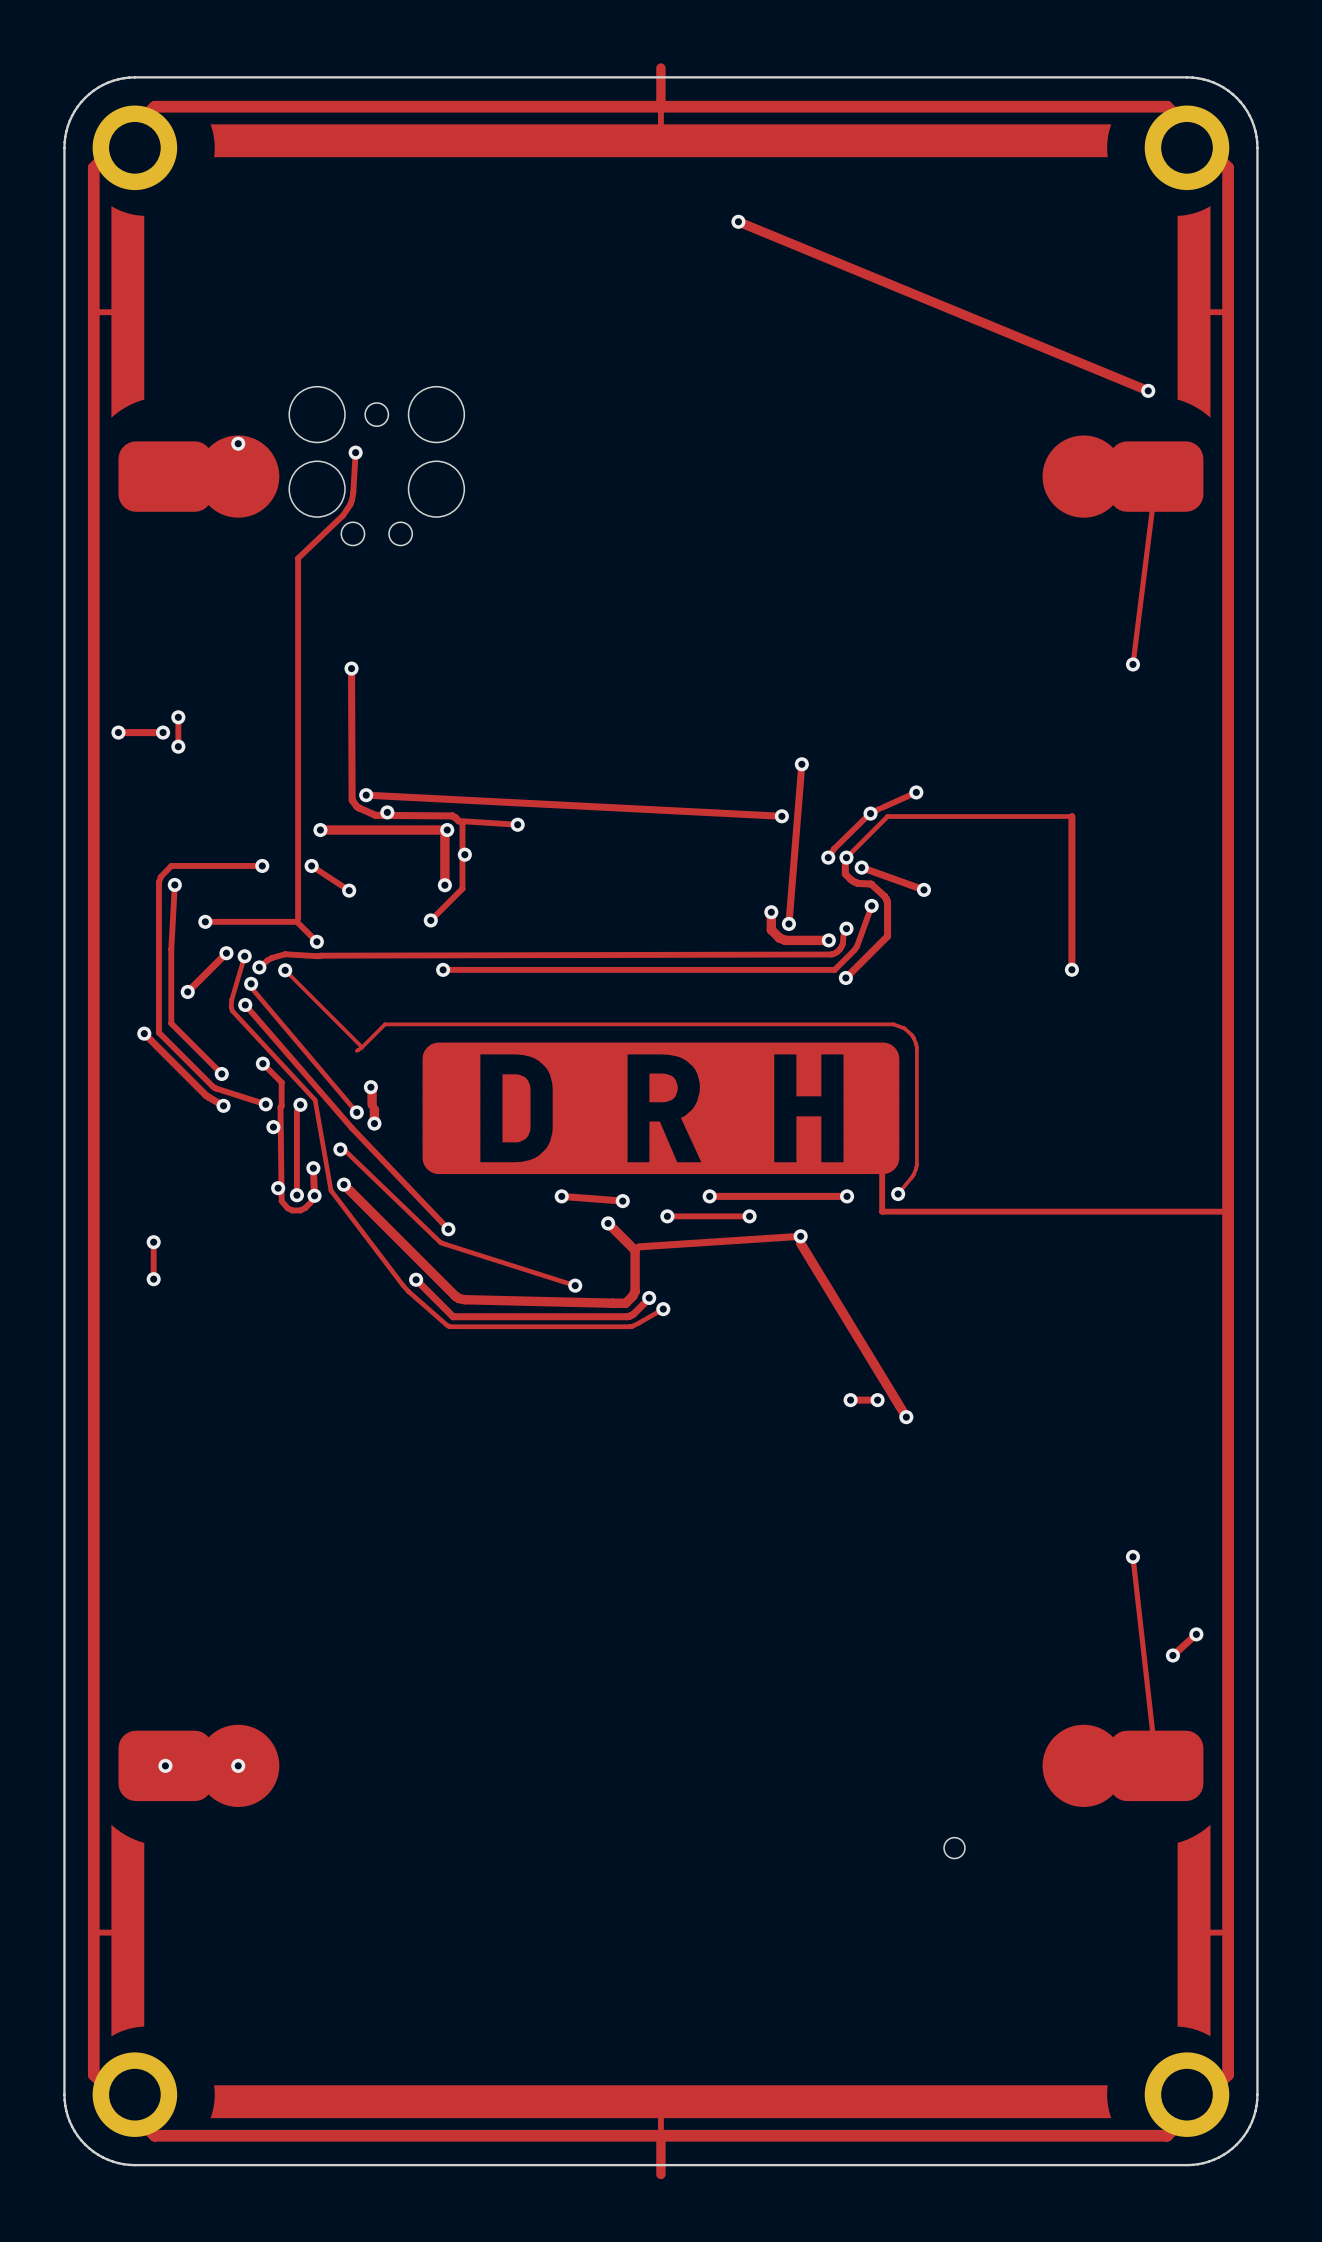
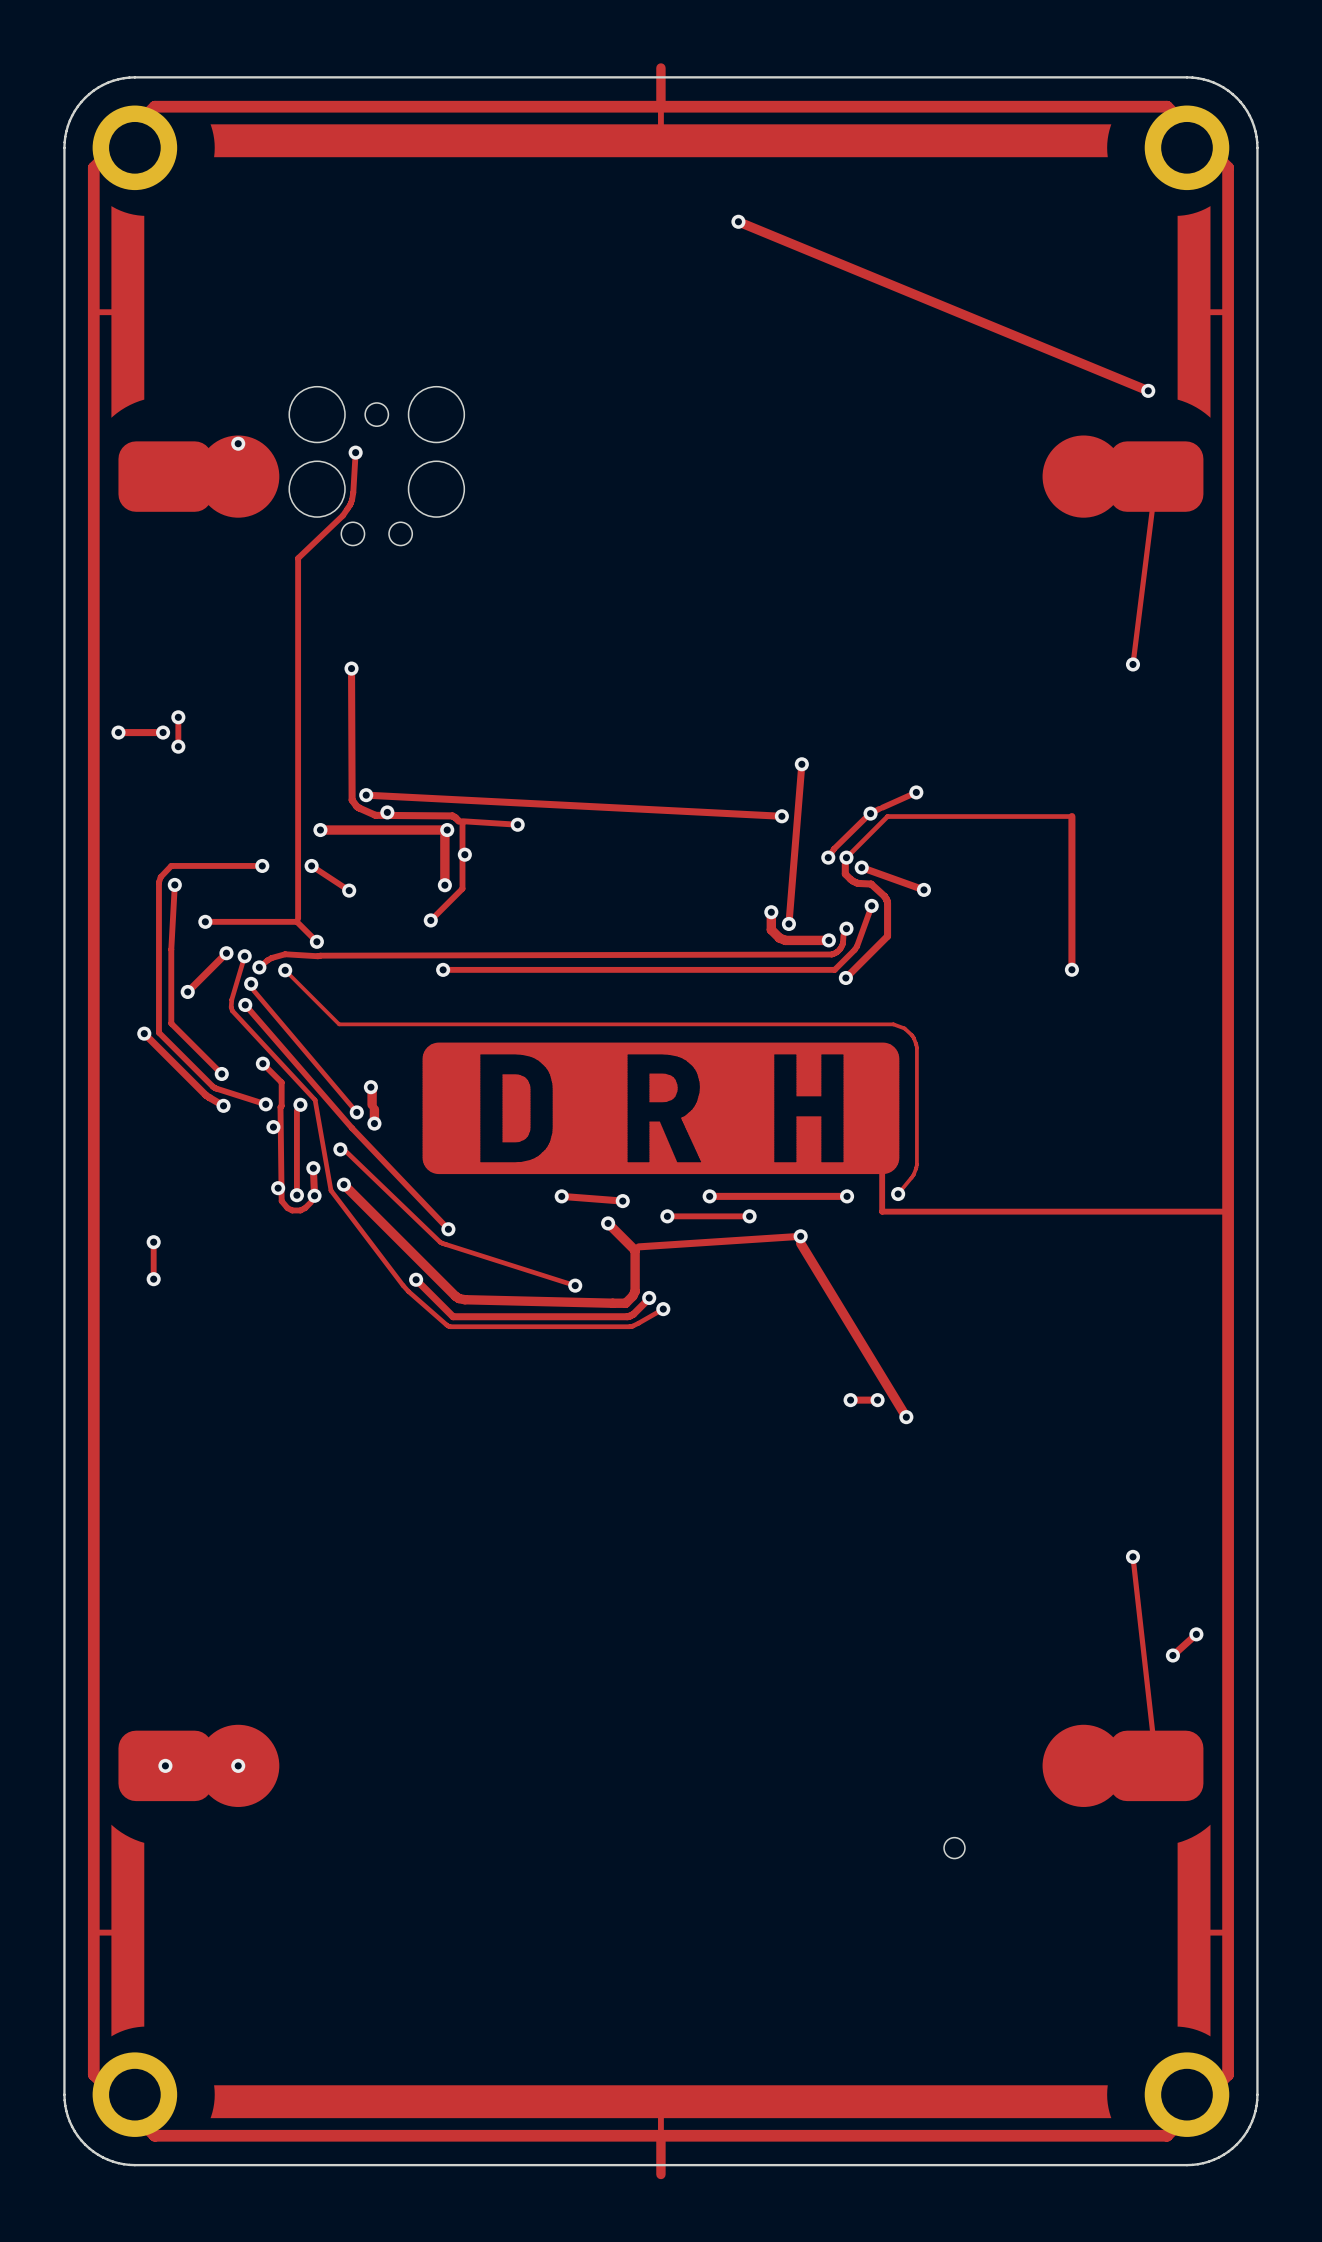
track: (339, 1024) (360, 1045) -> none
track: (385, 1024) (356, 1050) -> (385, 1024) (339, 1024)

